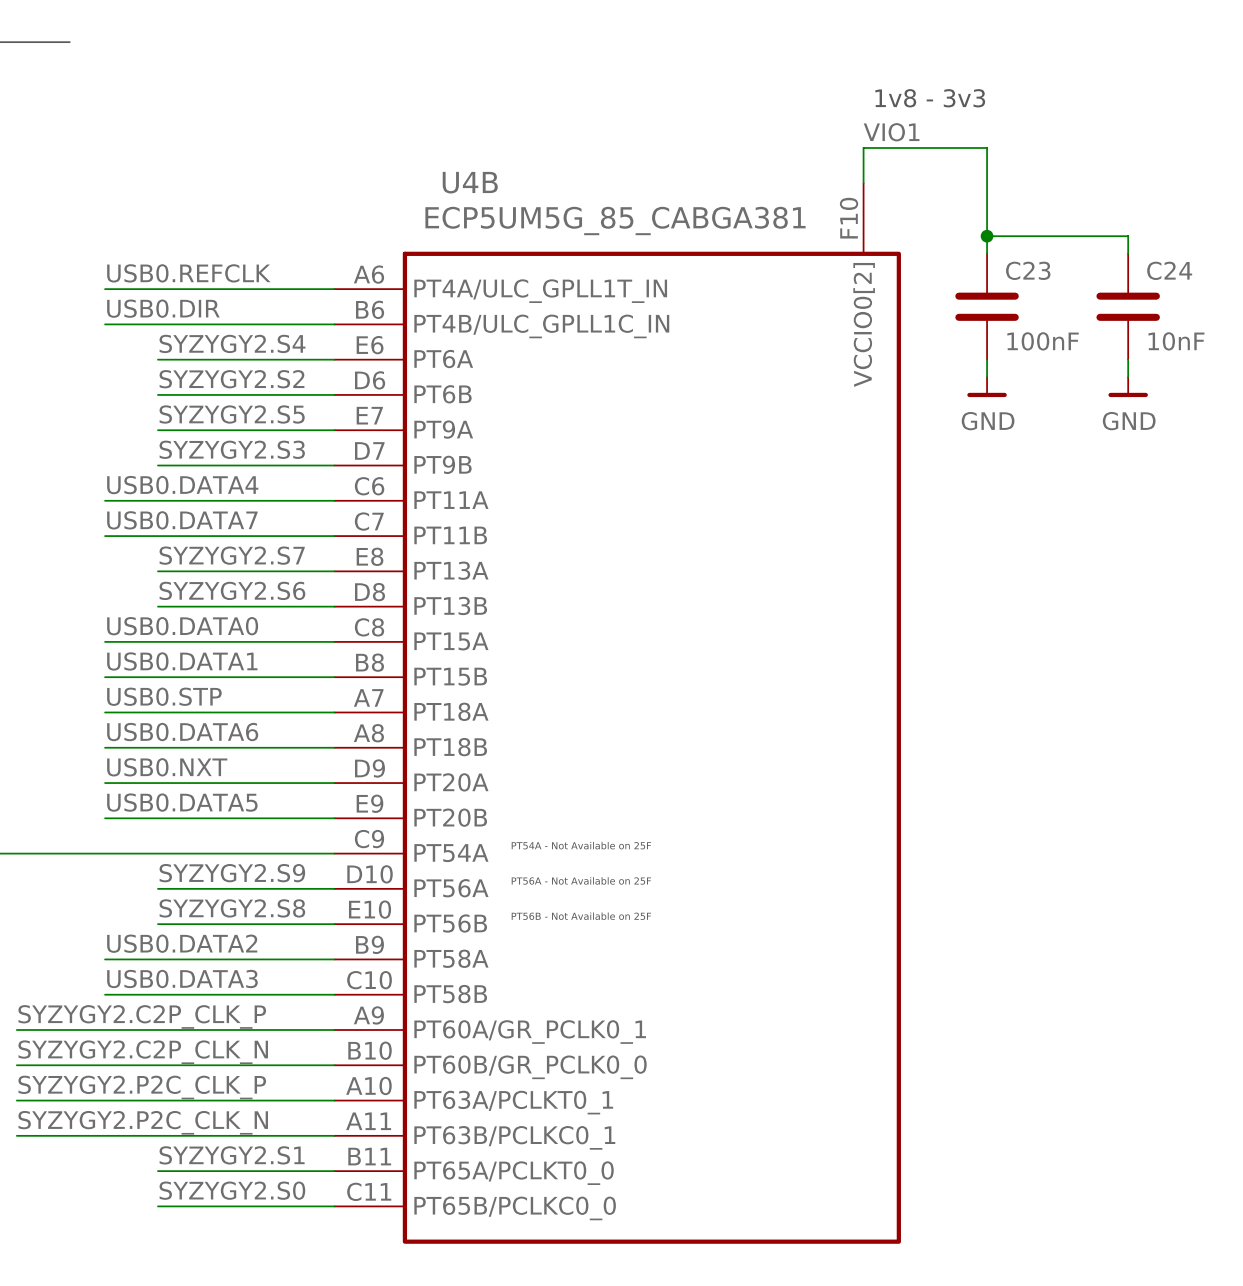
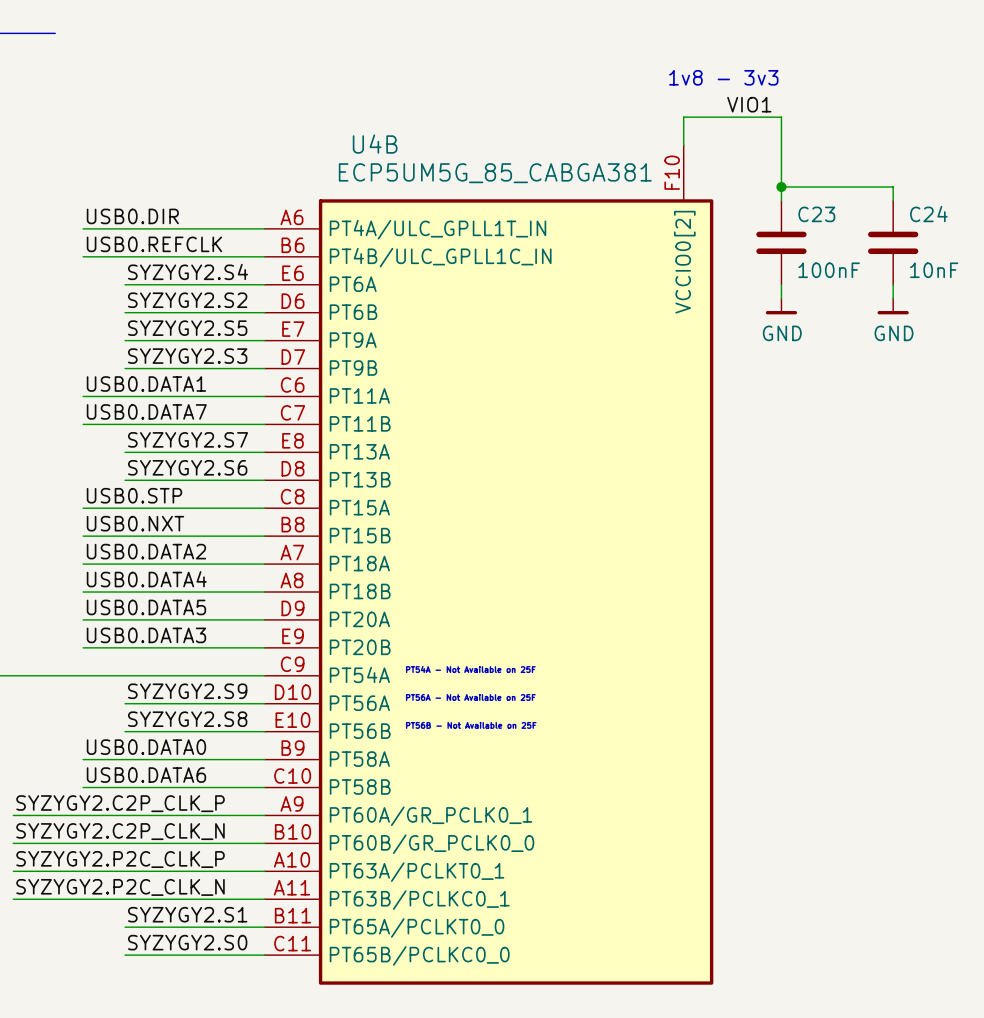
label position: VIO1 (891, 132) -> VIO1 (749, 104)
label: USB0.REFCLK (188, 273) -> USB0.DIR (132, 216)
label: USB0.DIR (163, 308) -> USB0.REFCLK (154, 244)
label: USB0.DATA4 (182, 485) -> USB0.DATA1 (146, 384)
label: USB0.DATA0 (182, 626) -> USB0.STP (134, 495)
label: USB0.DATA1 (182, 661) -> USB0.NXT (135, 523)
label: USB0.STP (164, 696) -> USB0.DATA2 (146, 551)
label: USB0.DATA6 (182, 732) -> USB0.DATA4 (146, 579)
label: USB0.NXT (167, 767) -> USB0.DATA5 (146, 607)
label: USB0.DATA5 (182, 802) -> USB0.DATA3 (146, 635)
label: USB0.DATA2 (182, 943) -> USB0.DATA0 (146, 747)
label: USB0.DATA3 (182, 978) -> USB0.DATA6 (146, 775)

